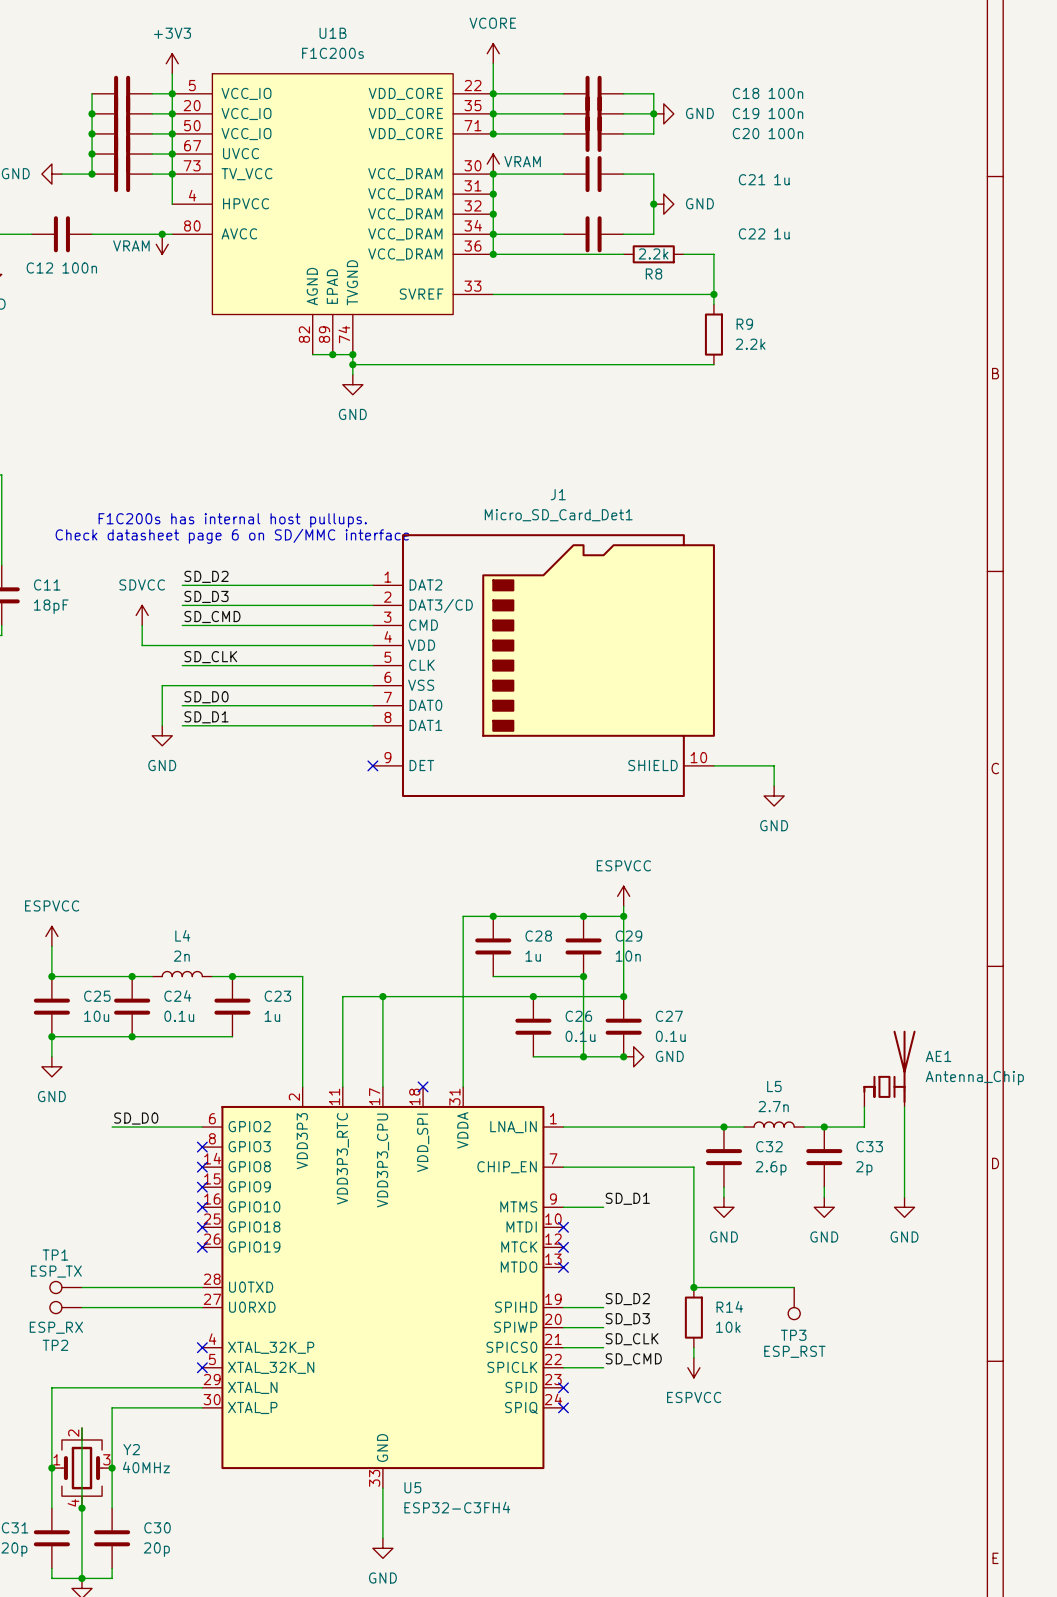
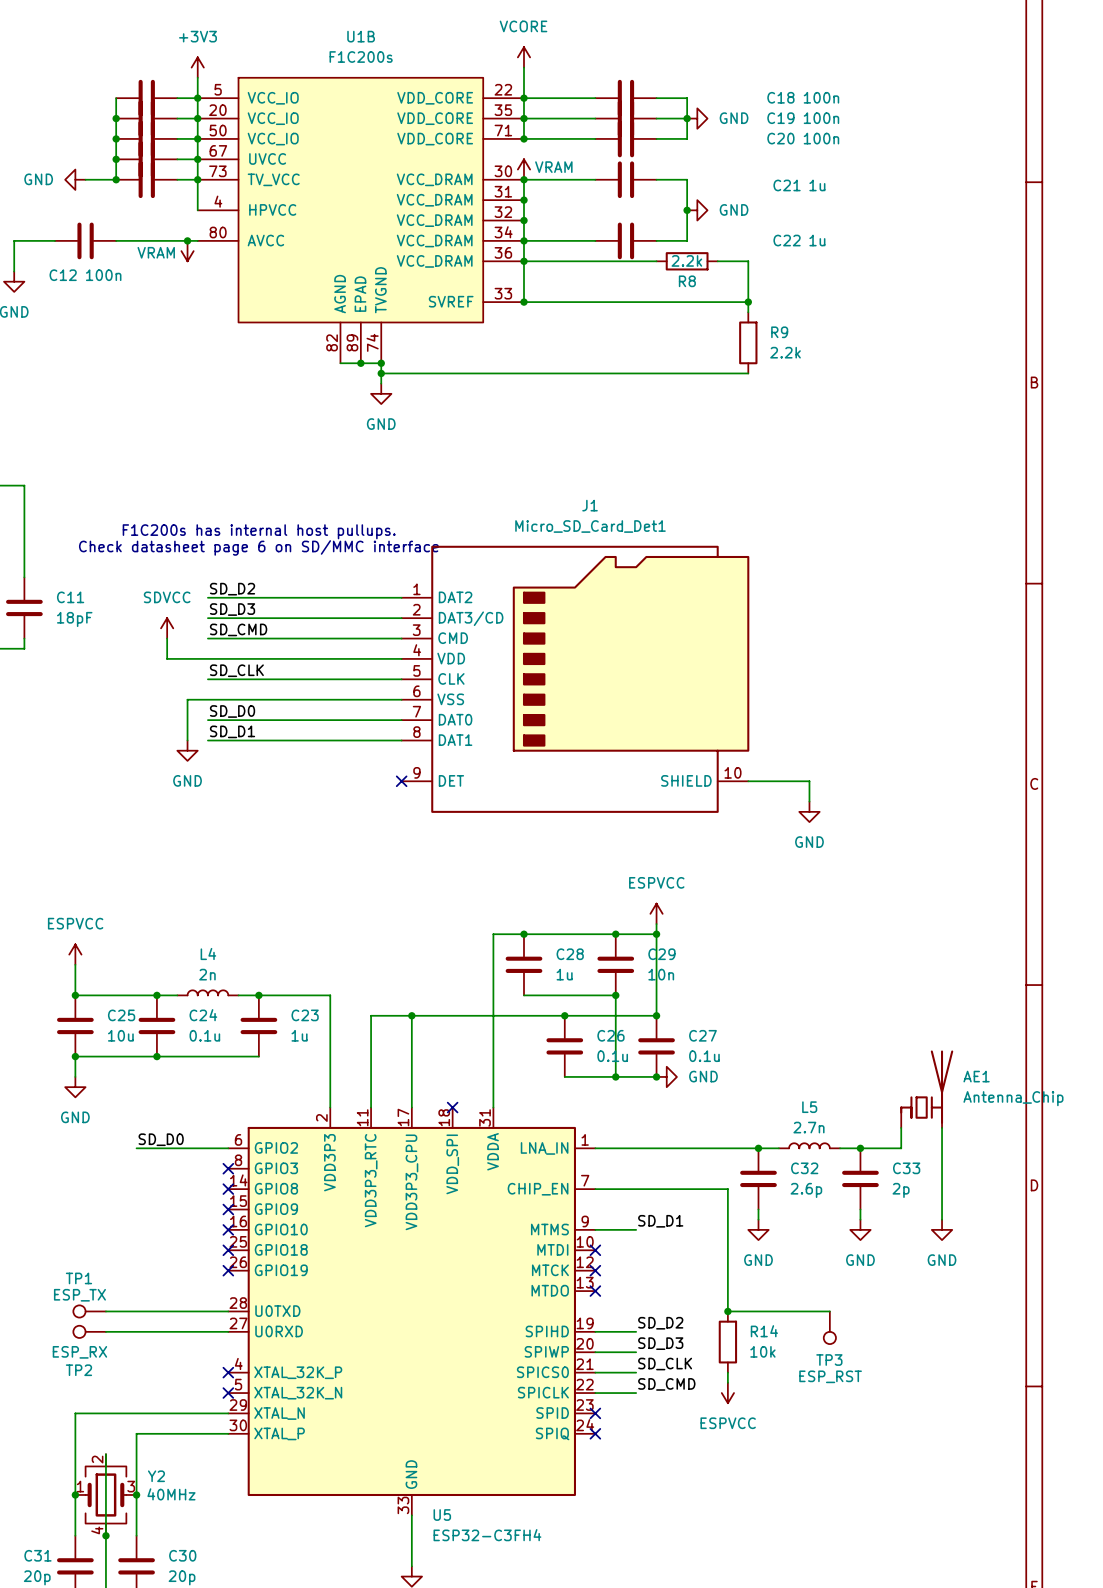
wire: none -> (523, 261) (523, 302)
junction: none -> (523, 302)

